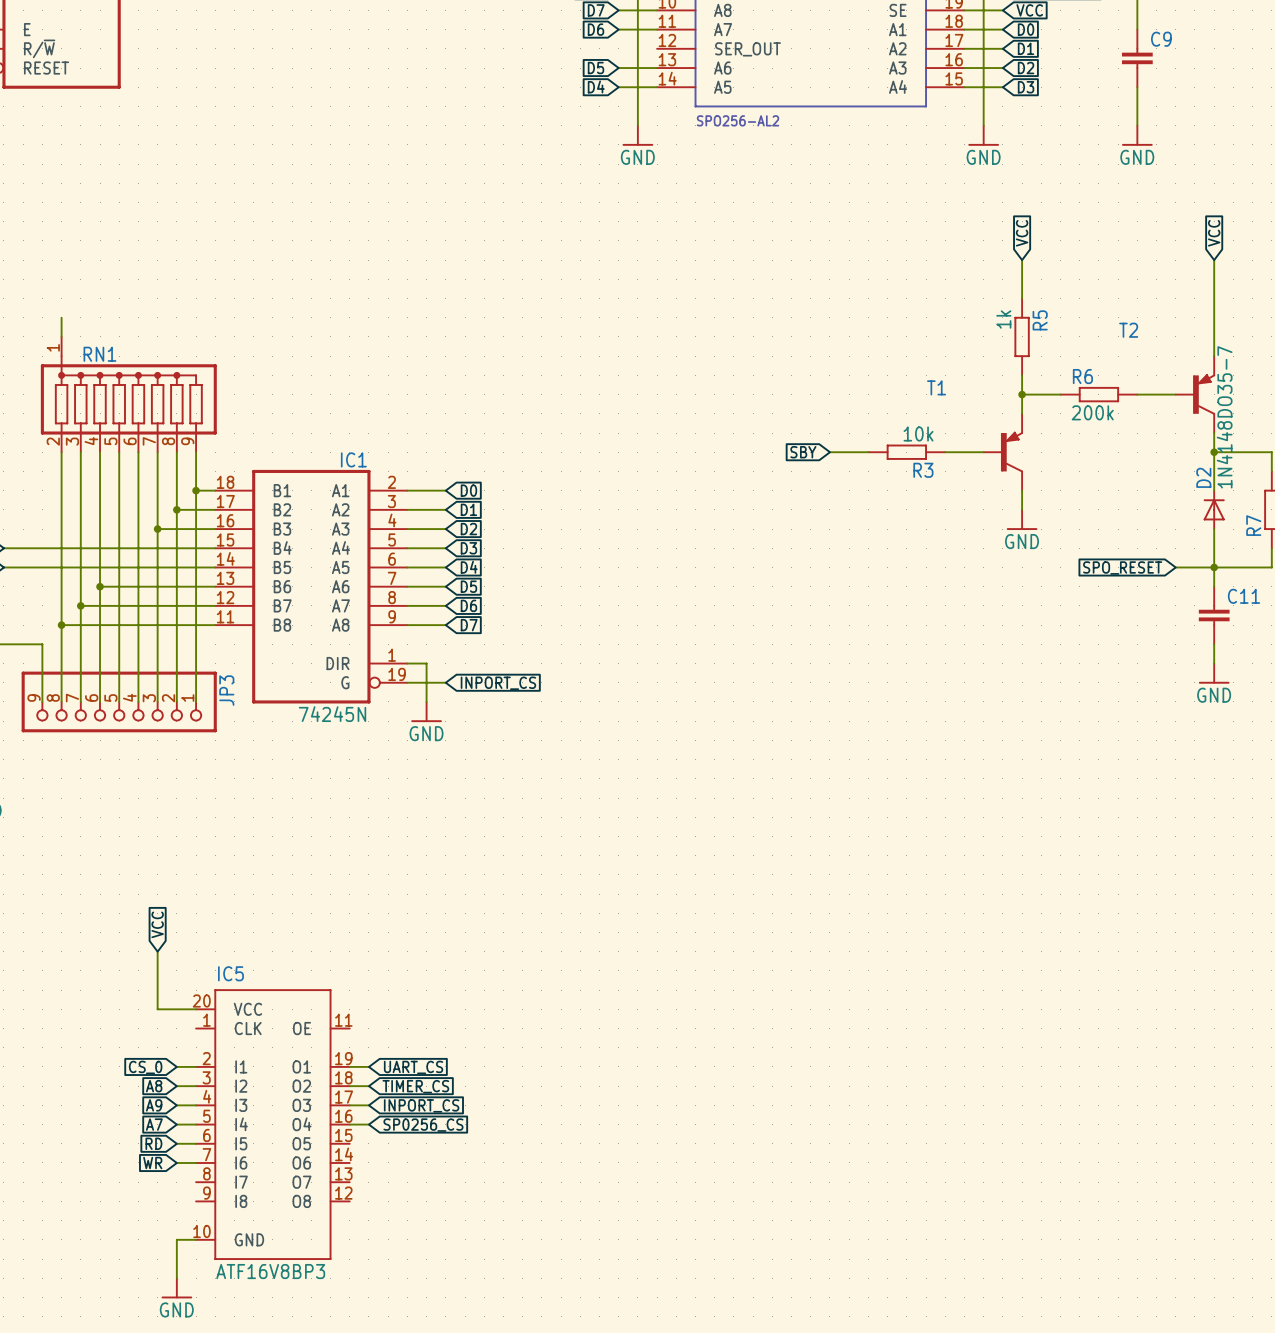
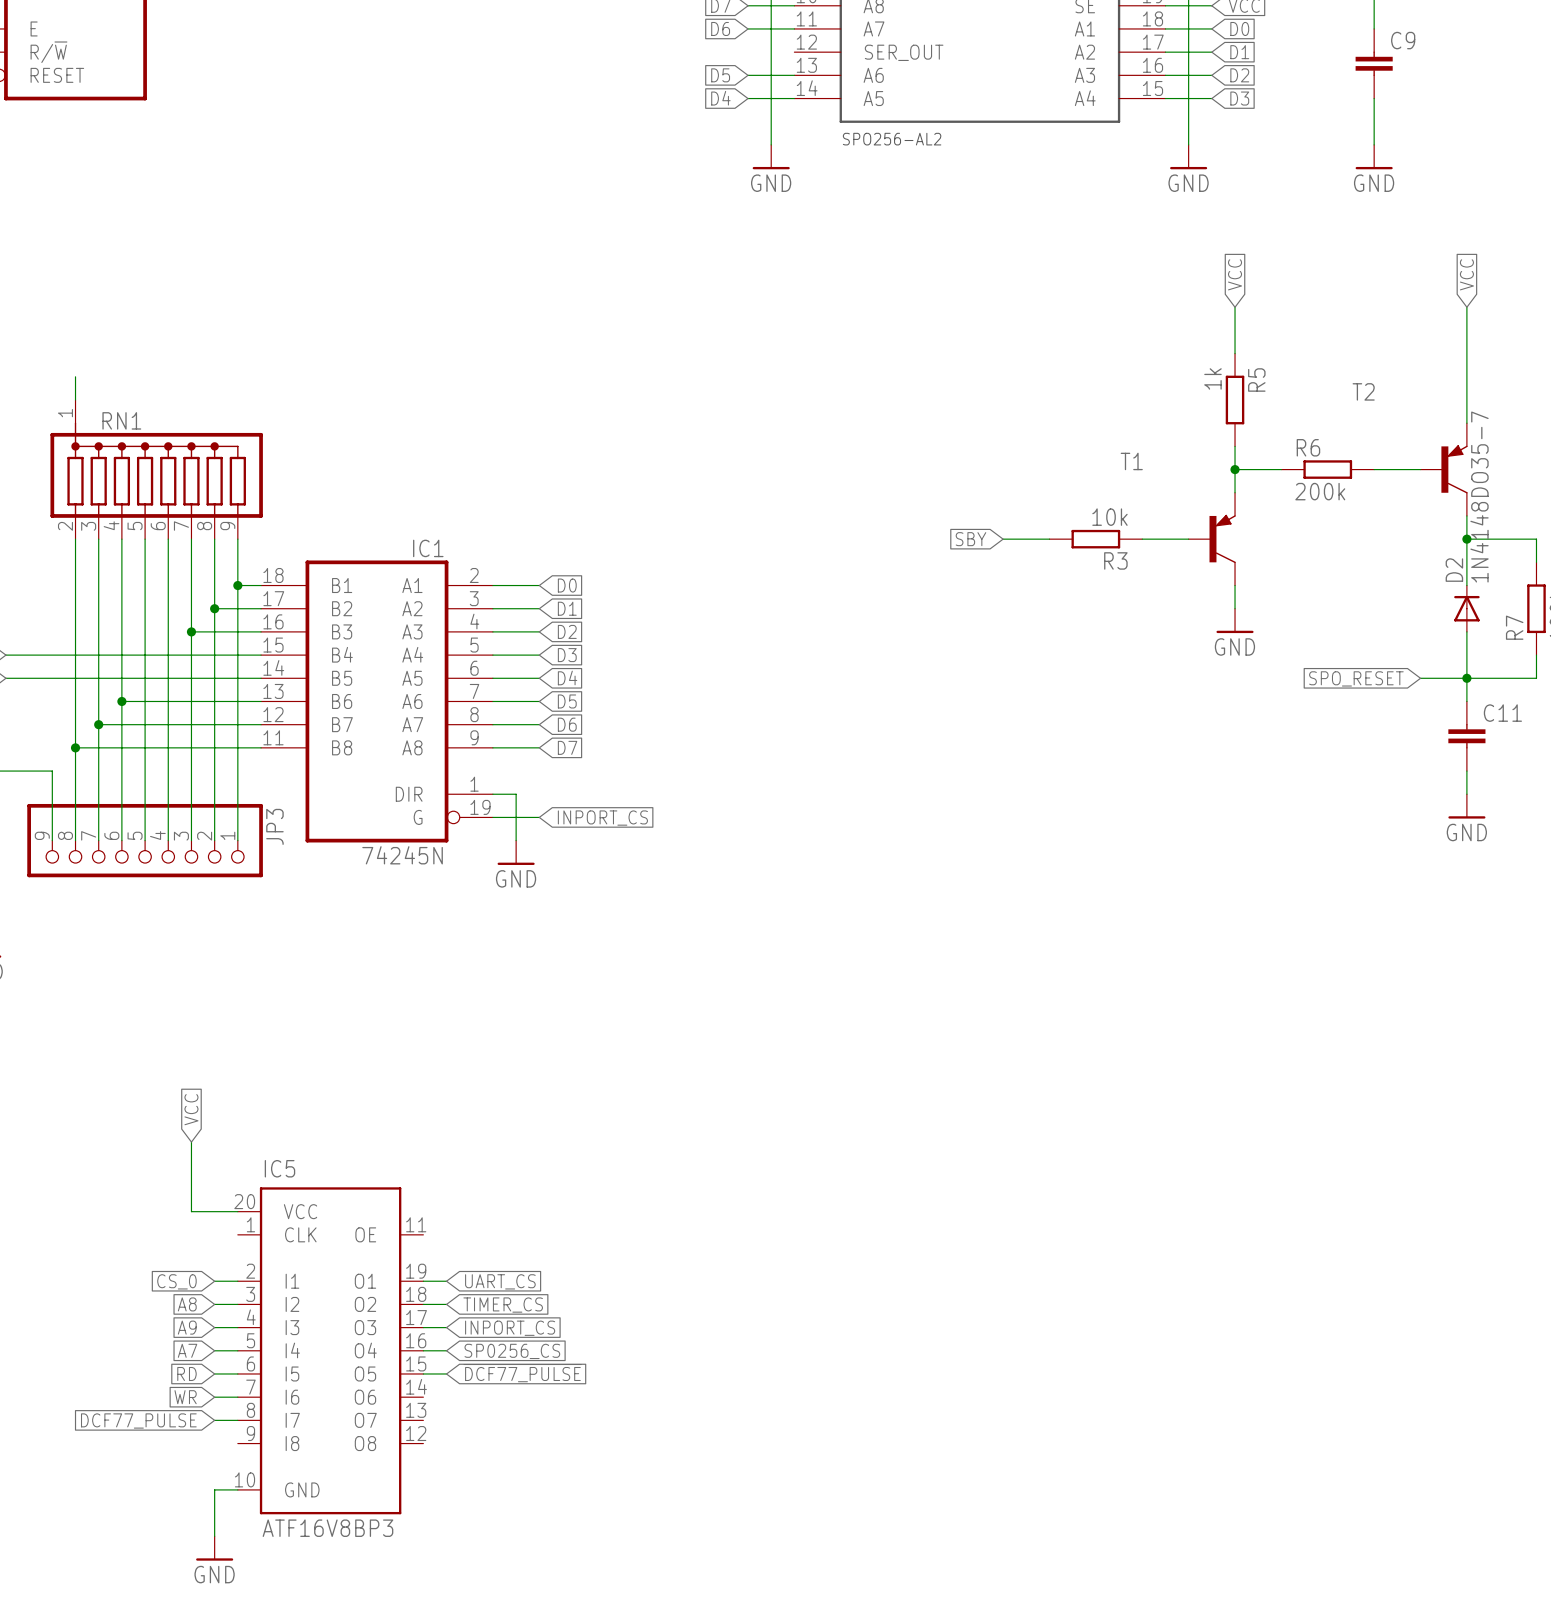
wire: none -> (423, 1373) (446, 1373)
global label: none -> ~{DCF77_PULSE} (522, 1373)
global label: none -> DCF77_PULSE (138, 1420)
wire: none -> (214, 1420) (237, 1420)

